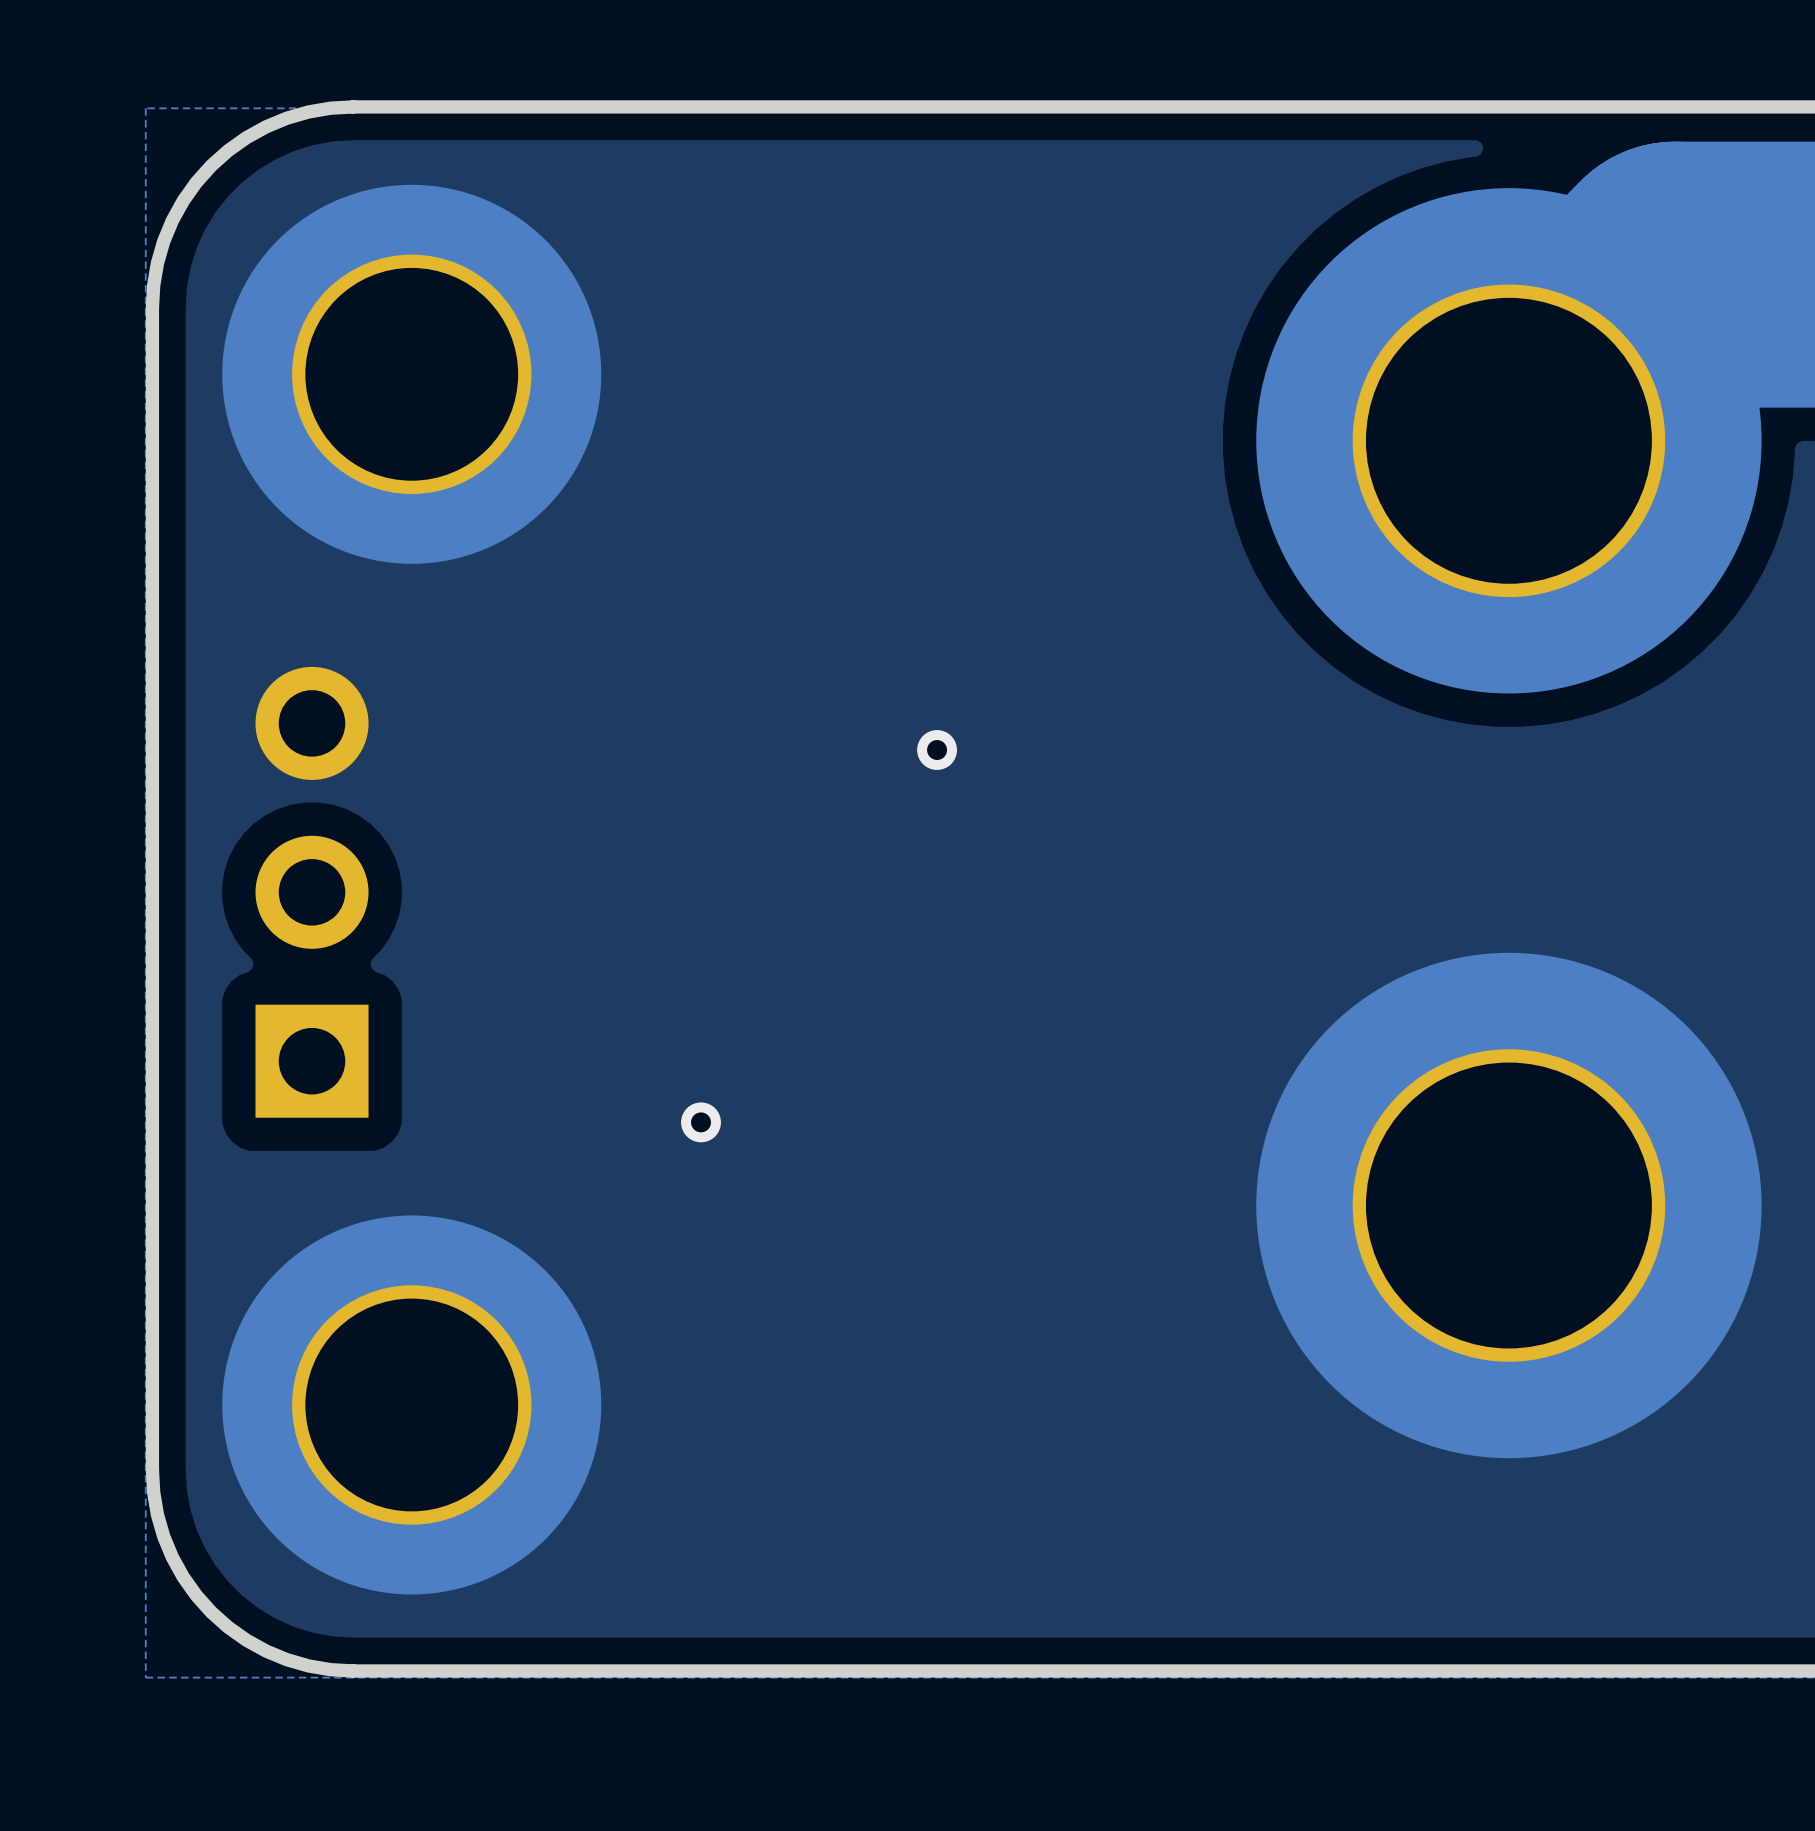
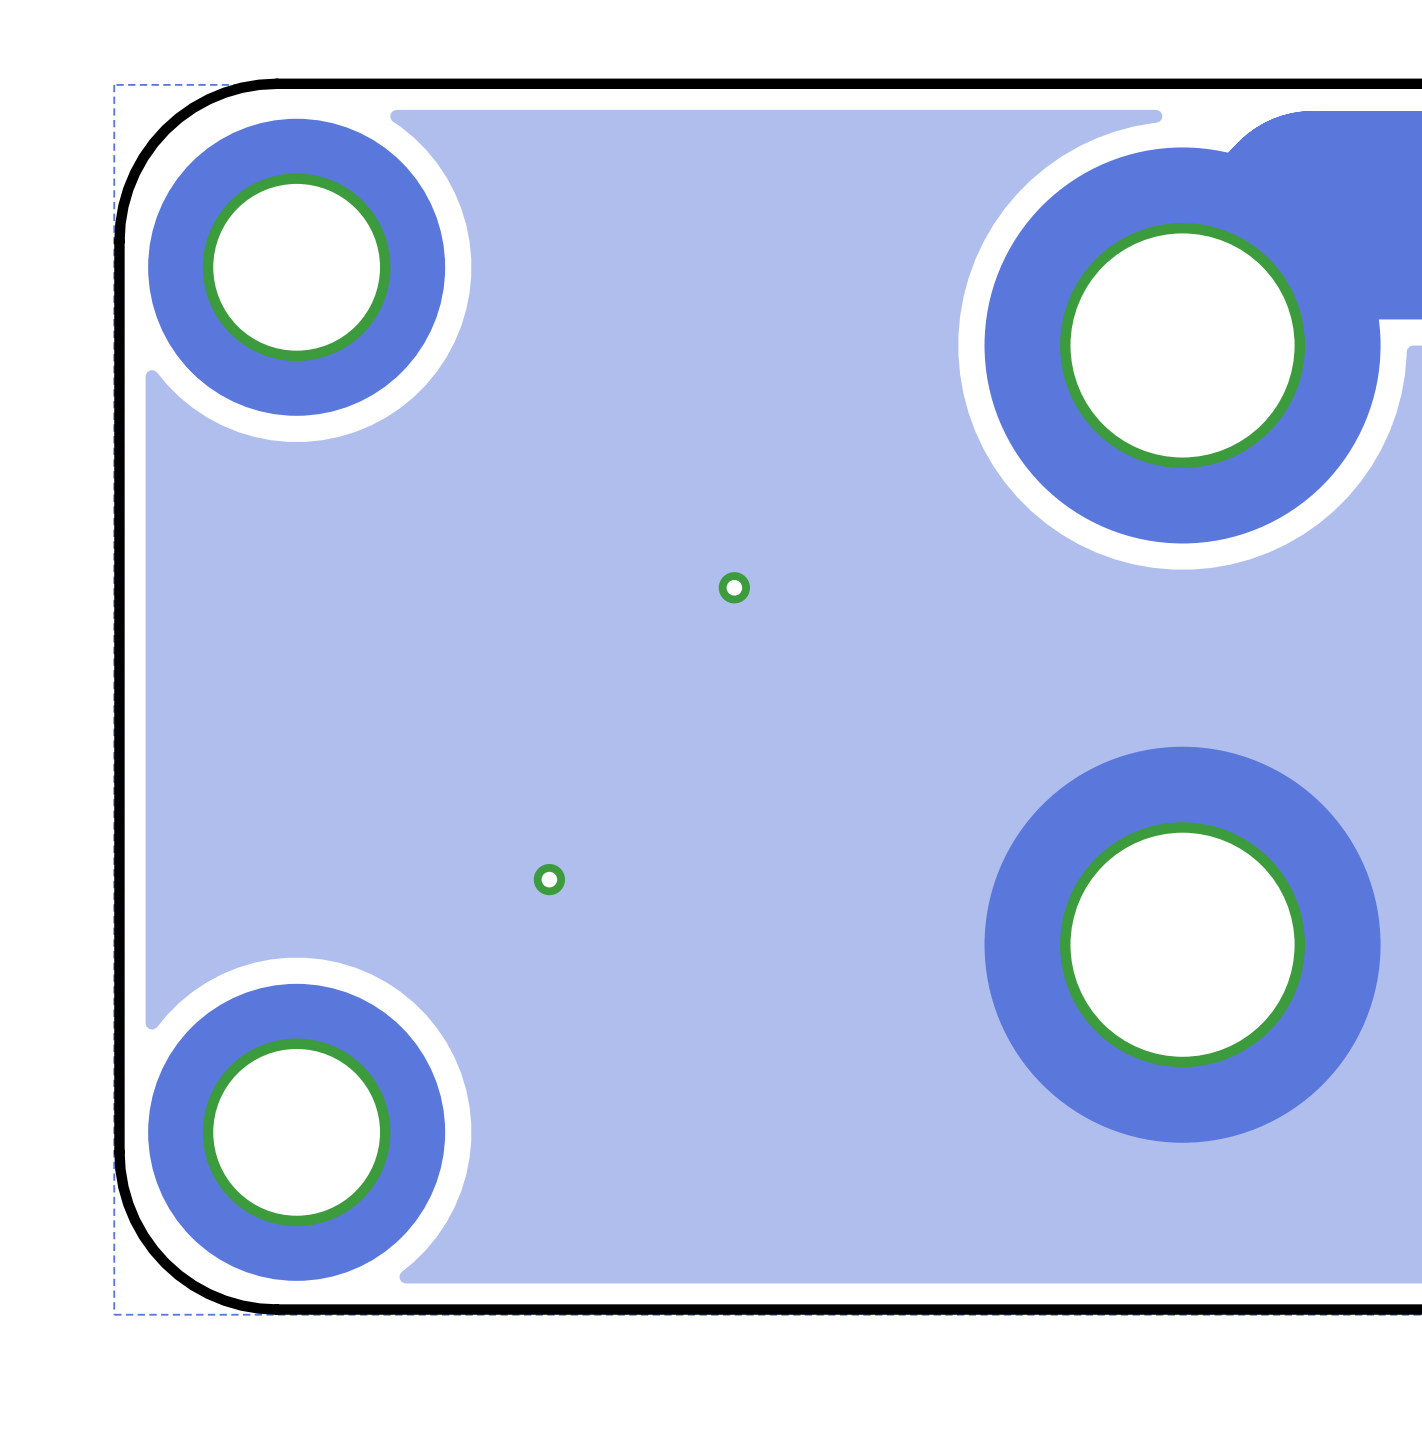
part position: (411, 374) -> (296, 267)
part: (312, 892) -> none
part position: (411, 1404) -> (296, 1132)

